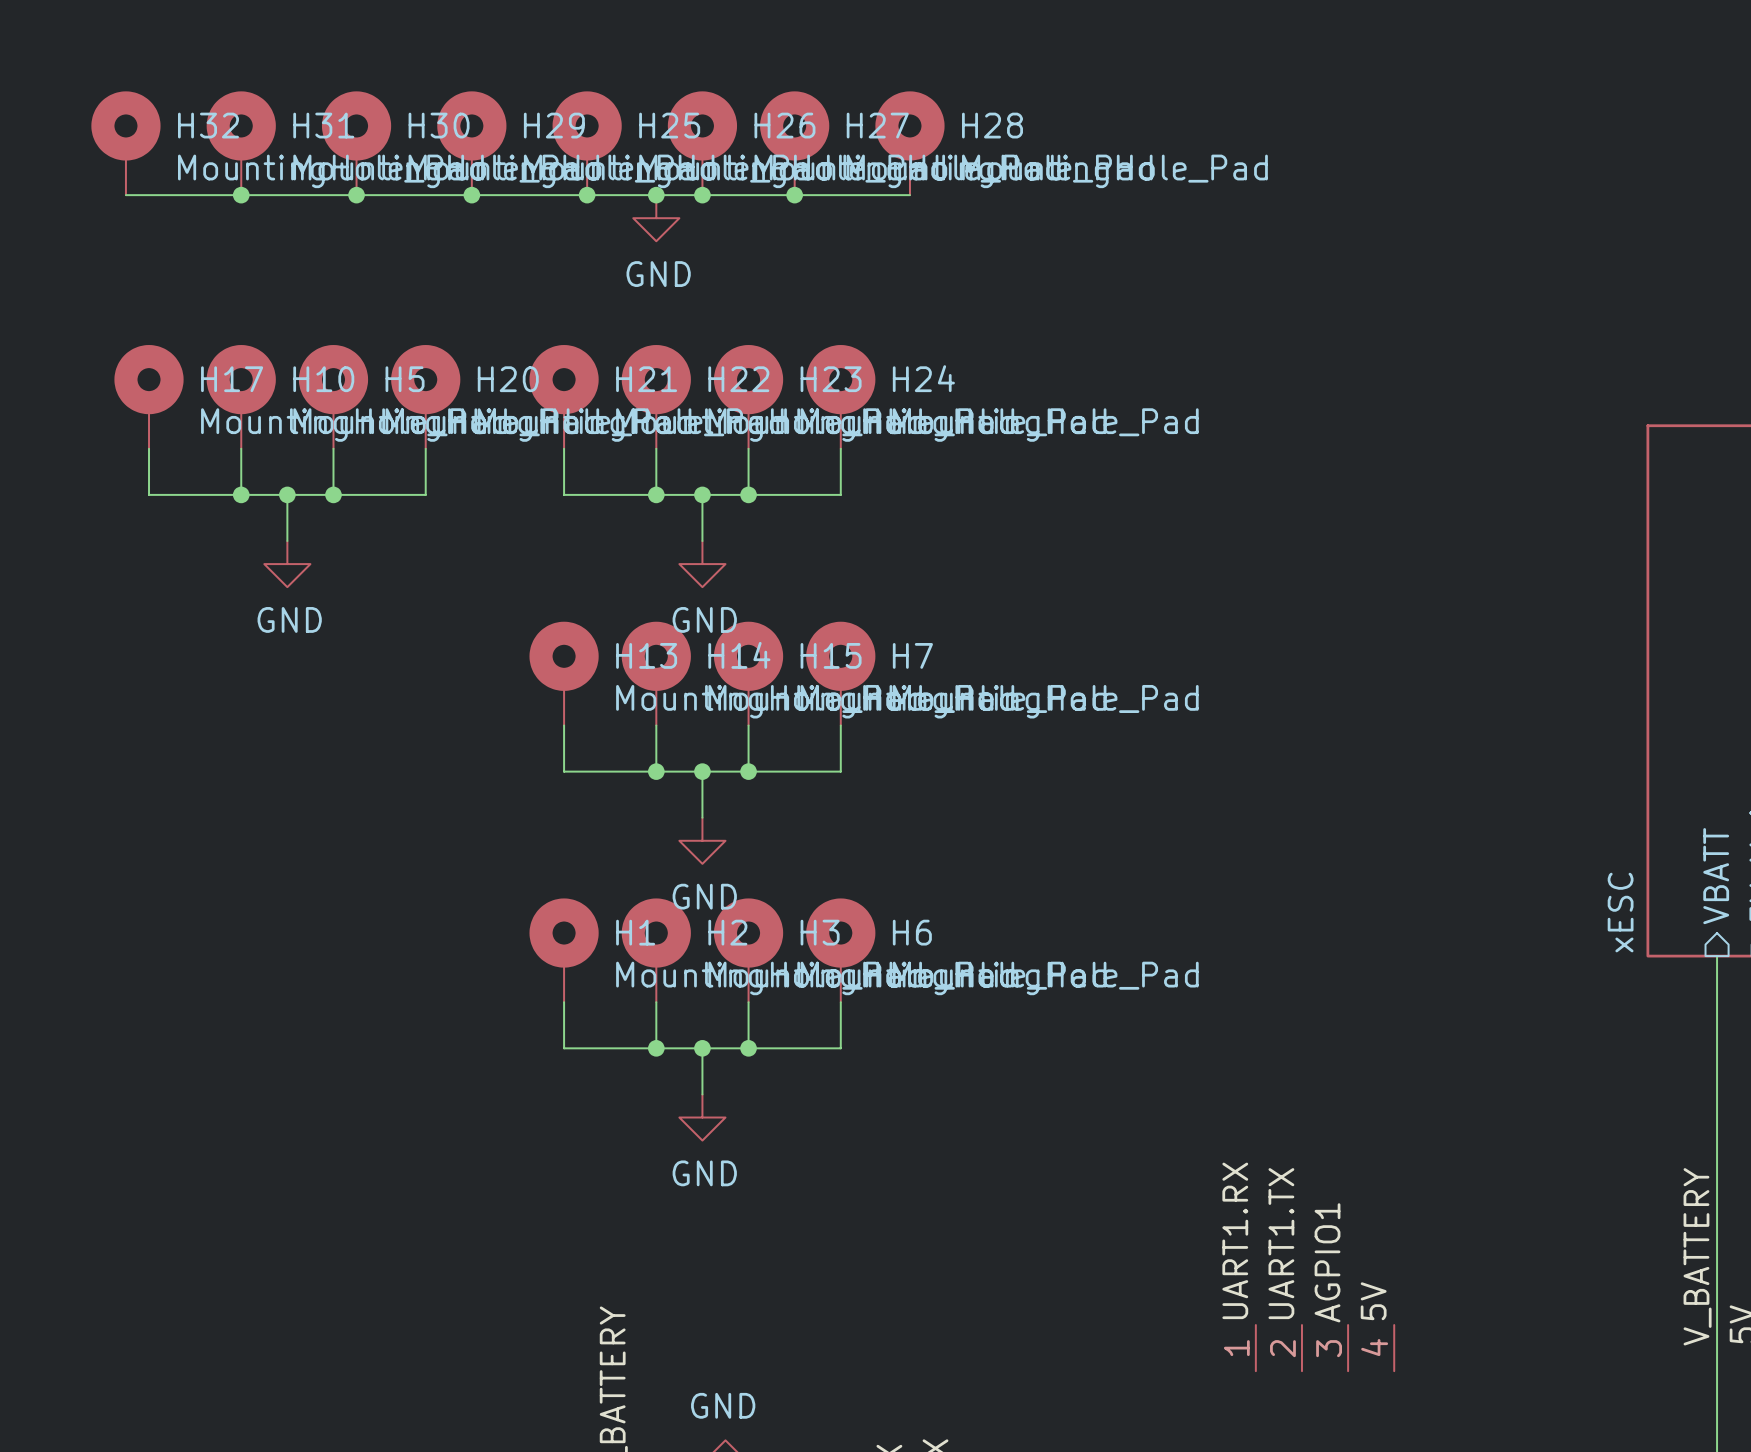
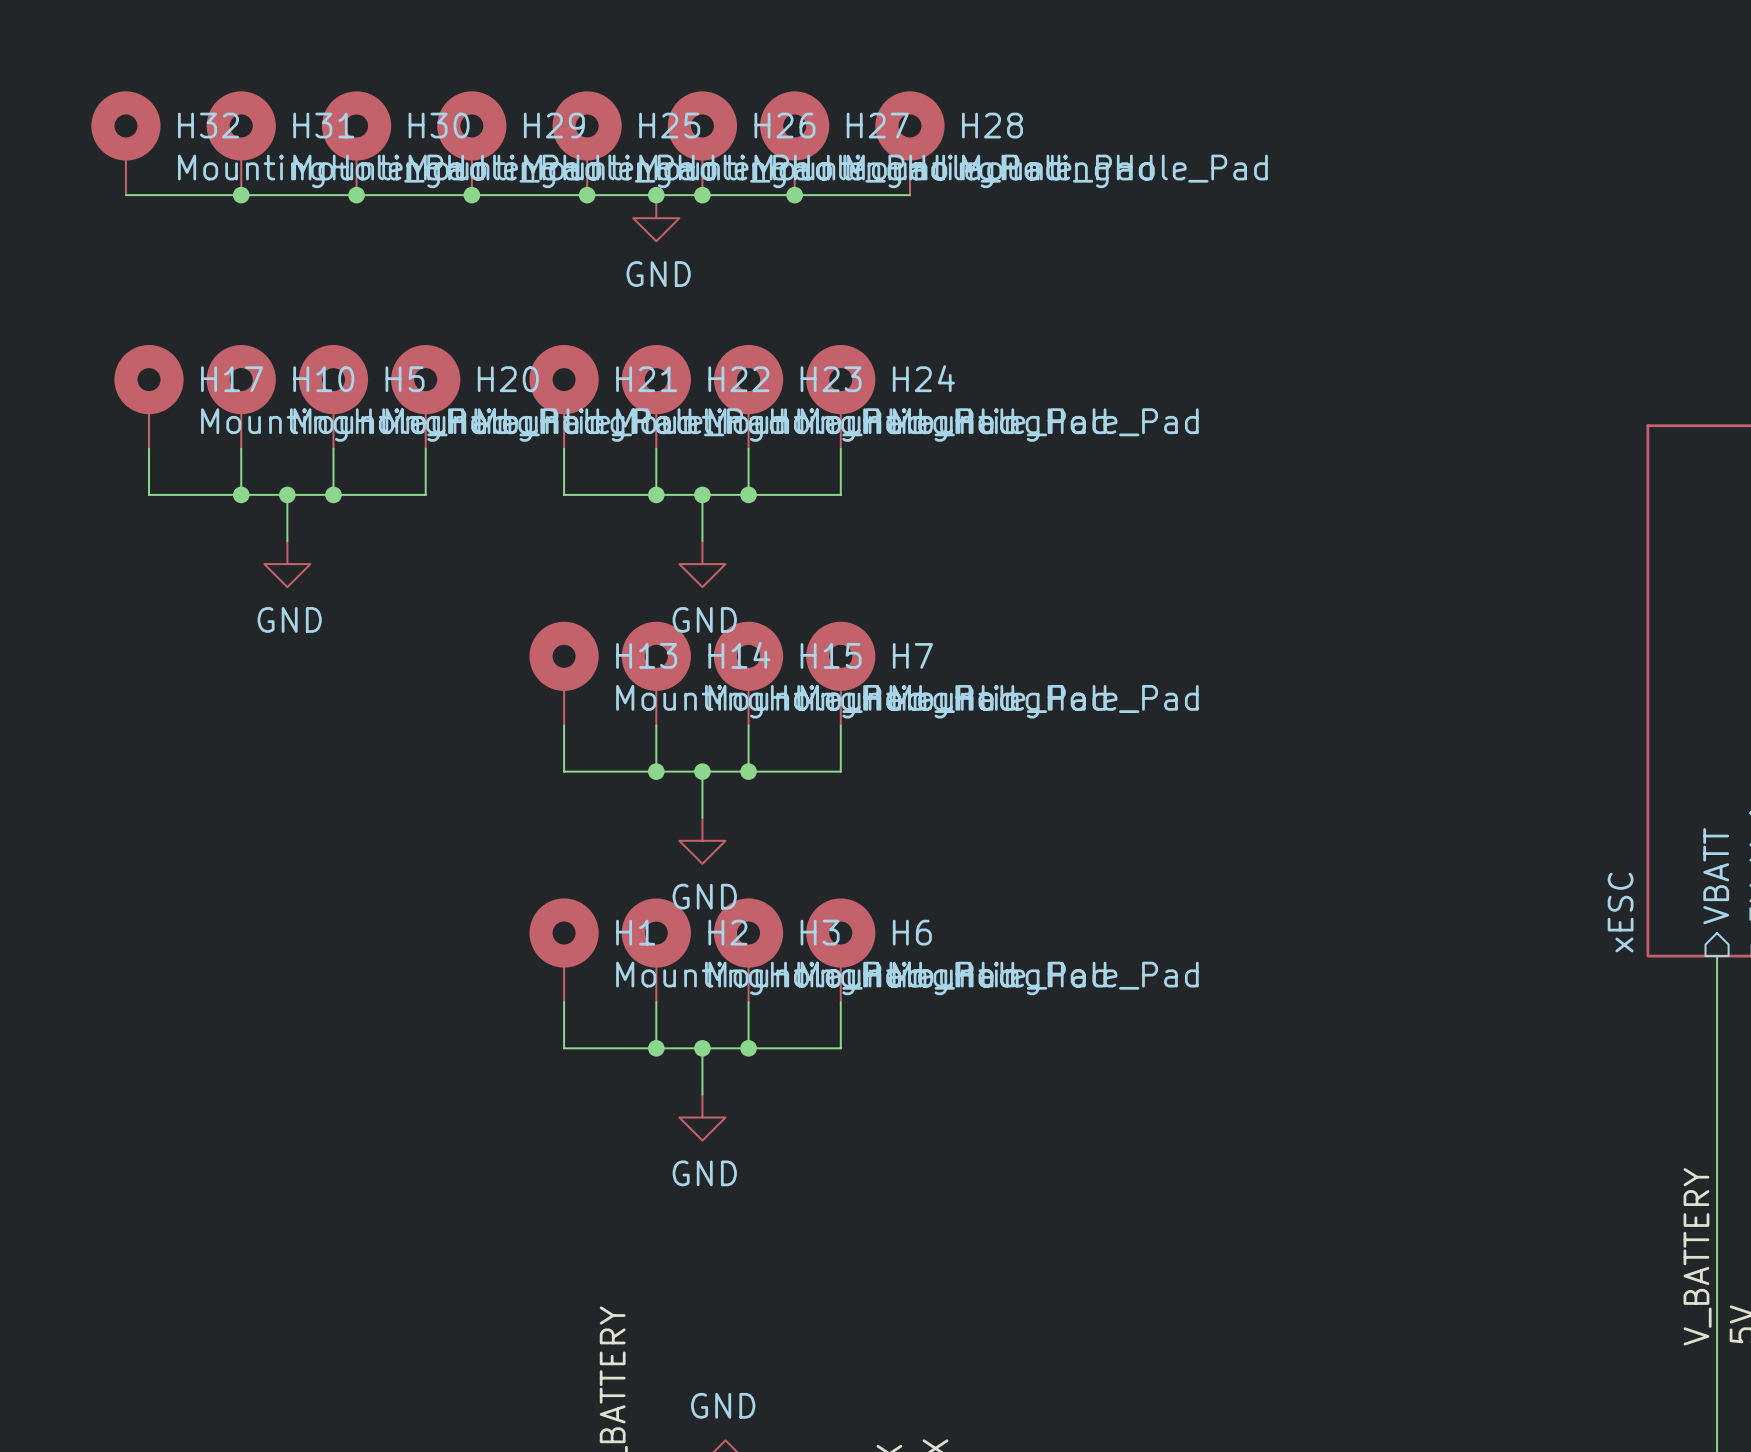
label: UART1.RX (1235, 1240) -> none
label: UART1.TX (1281, 1243) -> none
label: AGPIO1 (1327, 1262) -> none
label: 5V (1373, 1301) -> none
part: (1325, 1348) -> none

